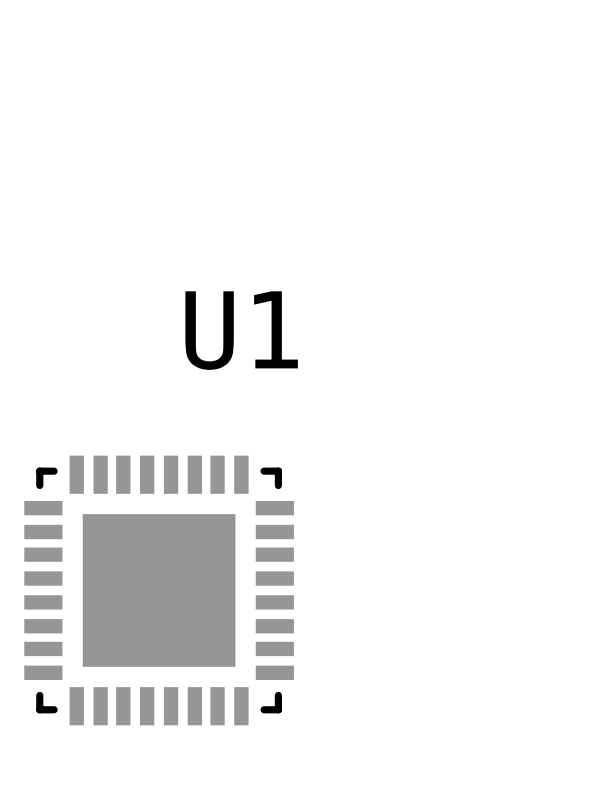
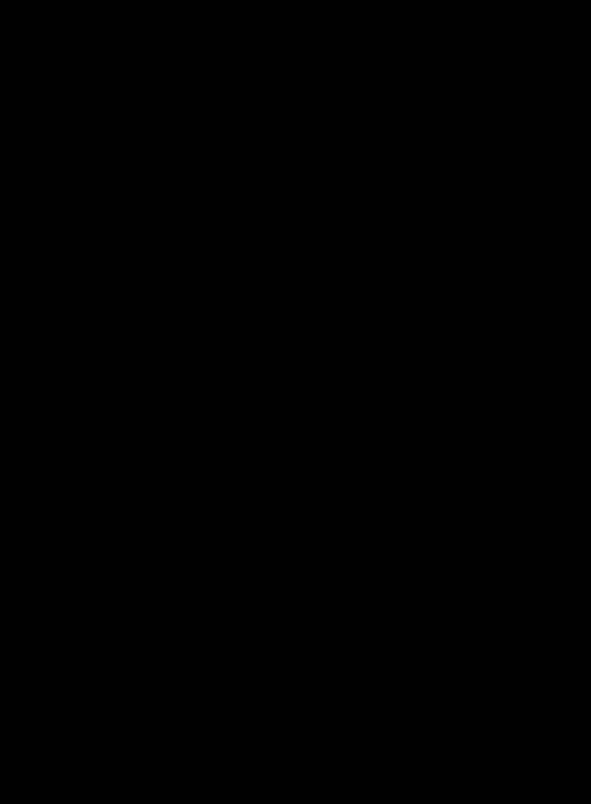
U1: (159, 590) -> none

